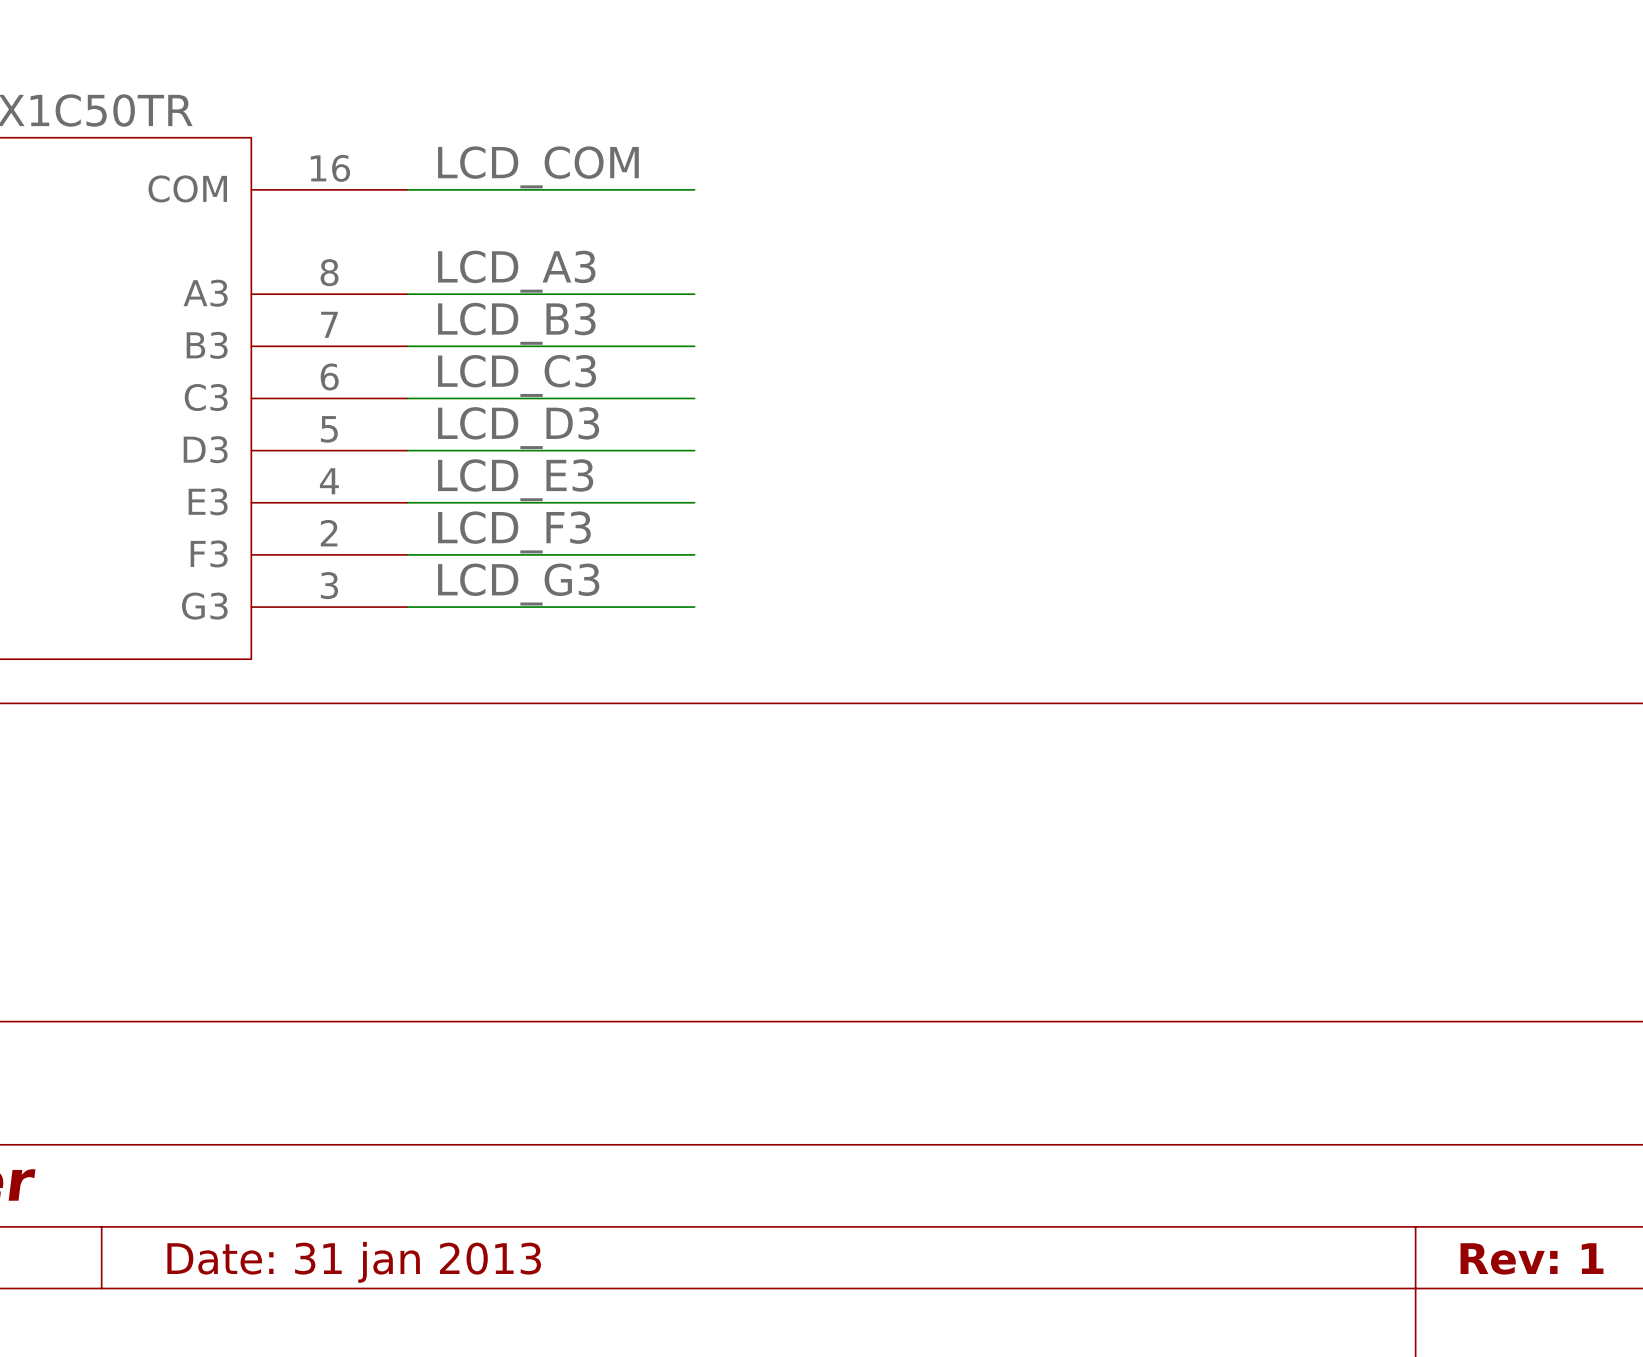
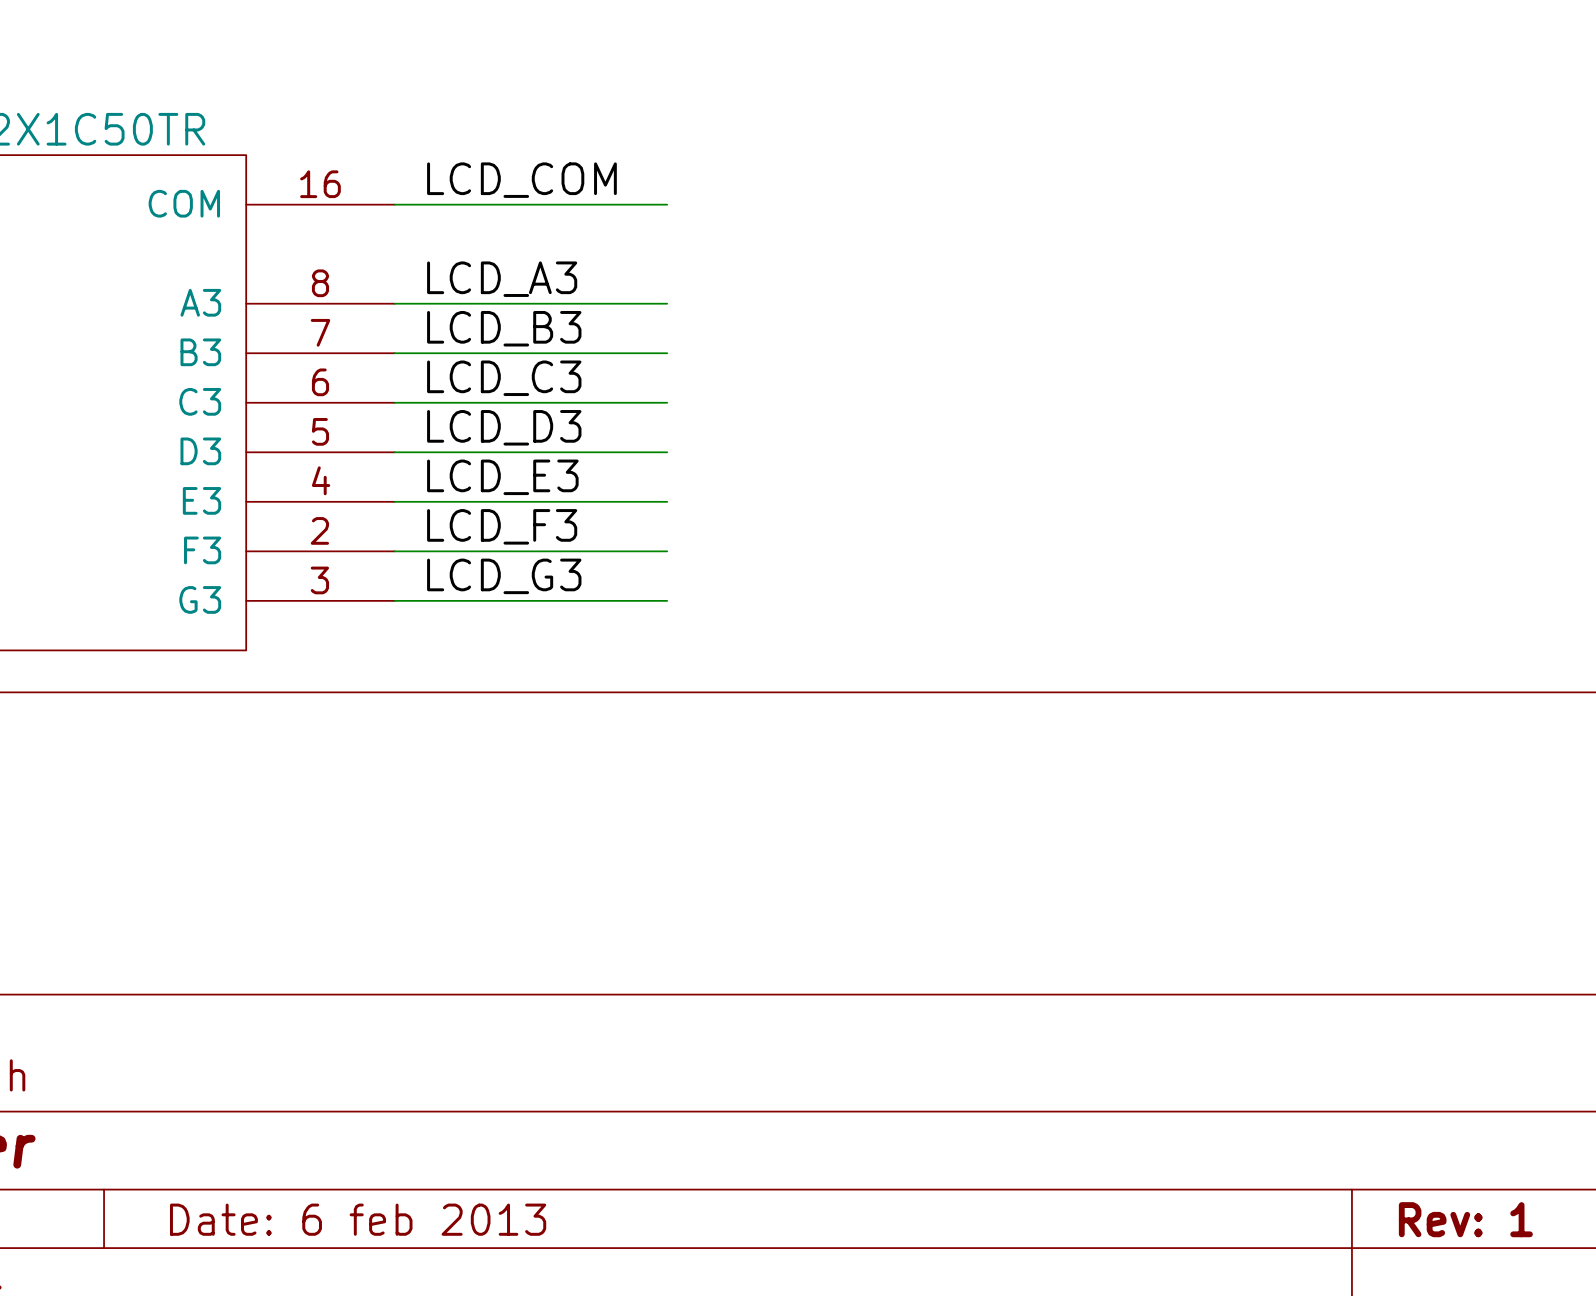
title block: Date: 31 jan 2013 (354, 1262) -> Date: 6 feb 2013 (358, 1219)

